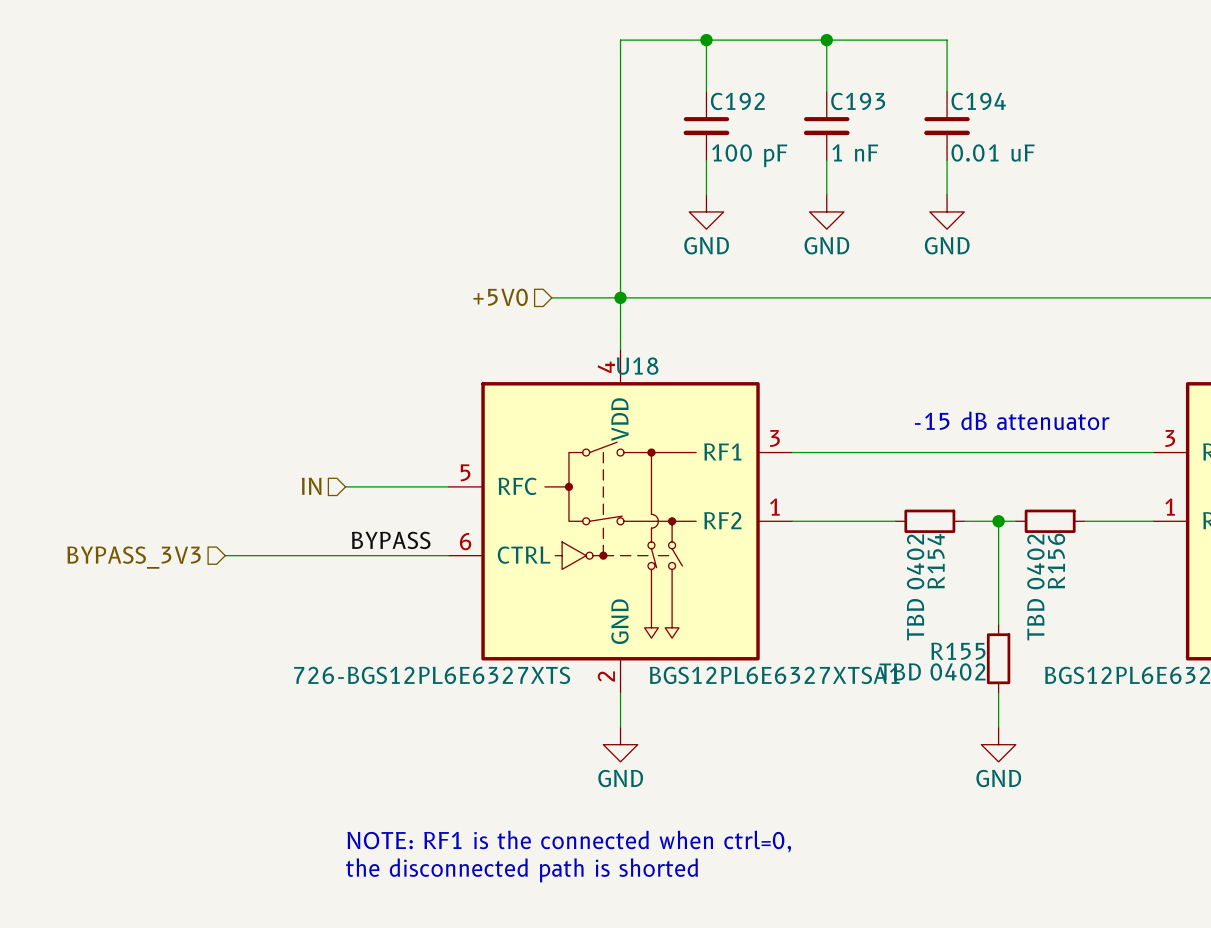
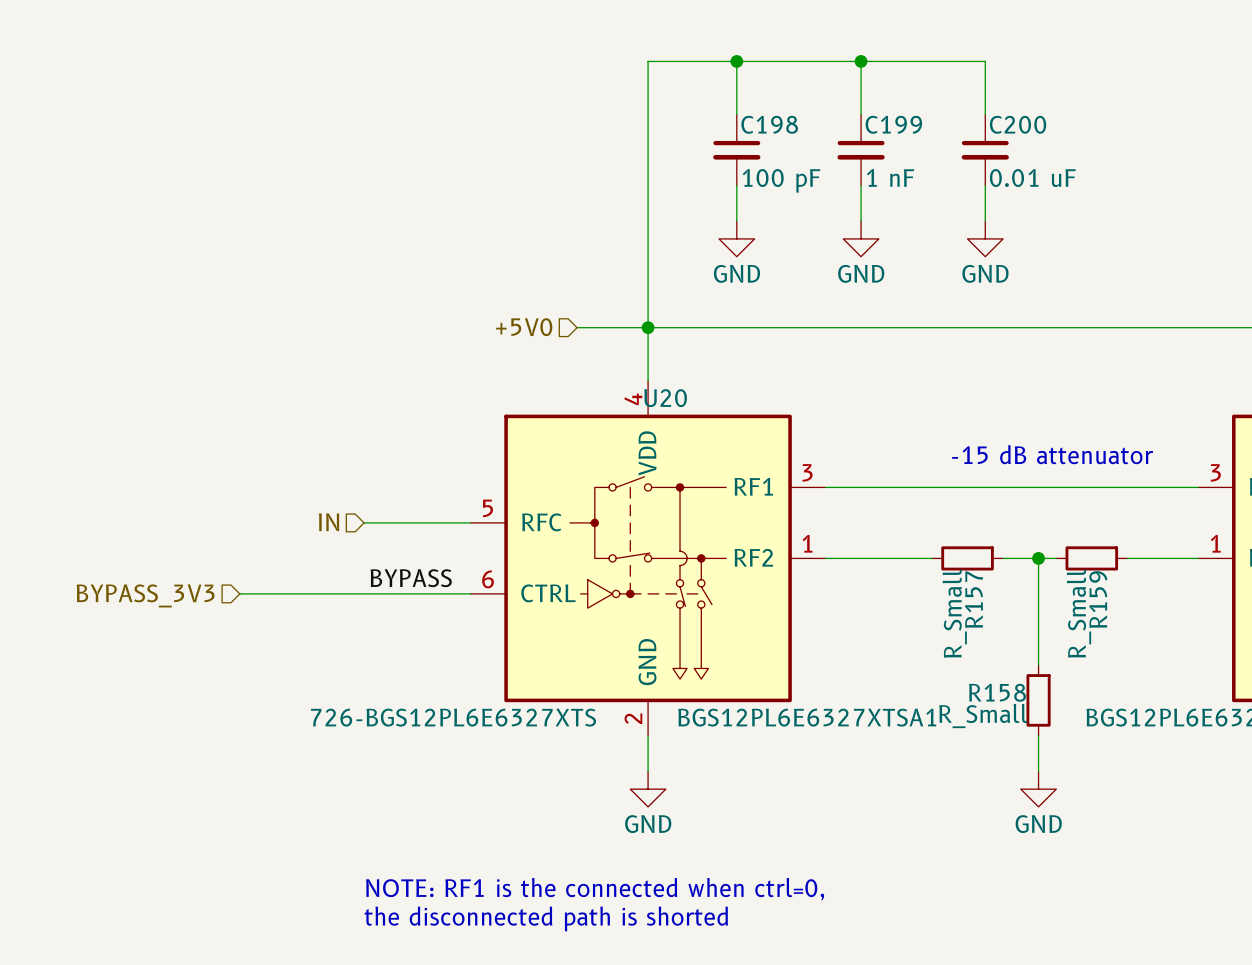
C192 name: C192 (737, 101) -> C198 (769, 124)
C193 name: C193 (858, 101) -> C199 (893, 124)
C194 name: C194 (978, 101) -> C200 (1018, 124)
U18 name: U18 (637, 366) -> U20 (665, 398)
R154 name: R154 (936, 561) -> R157 (973, 599)
R156 name: R156 (1056, 561) -> R159 (1098, 599)
R154 value: TBD 0402 (915, 587) -> R_Small (954, 613)
R156 value: TBD 0402 (1035, 587) -> R_Small (1079, 613)
R155 name: R155 (958, 651) -> R158 (997, 692)
R155 value: TBD 0402 (932, 671) -> R_Small (983, 716)

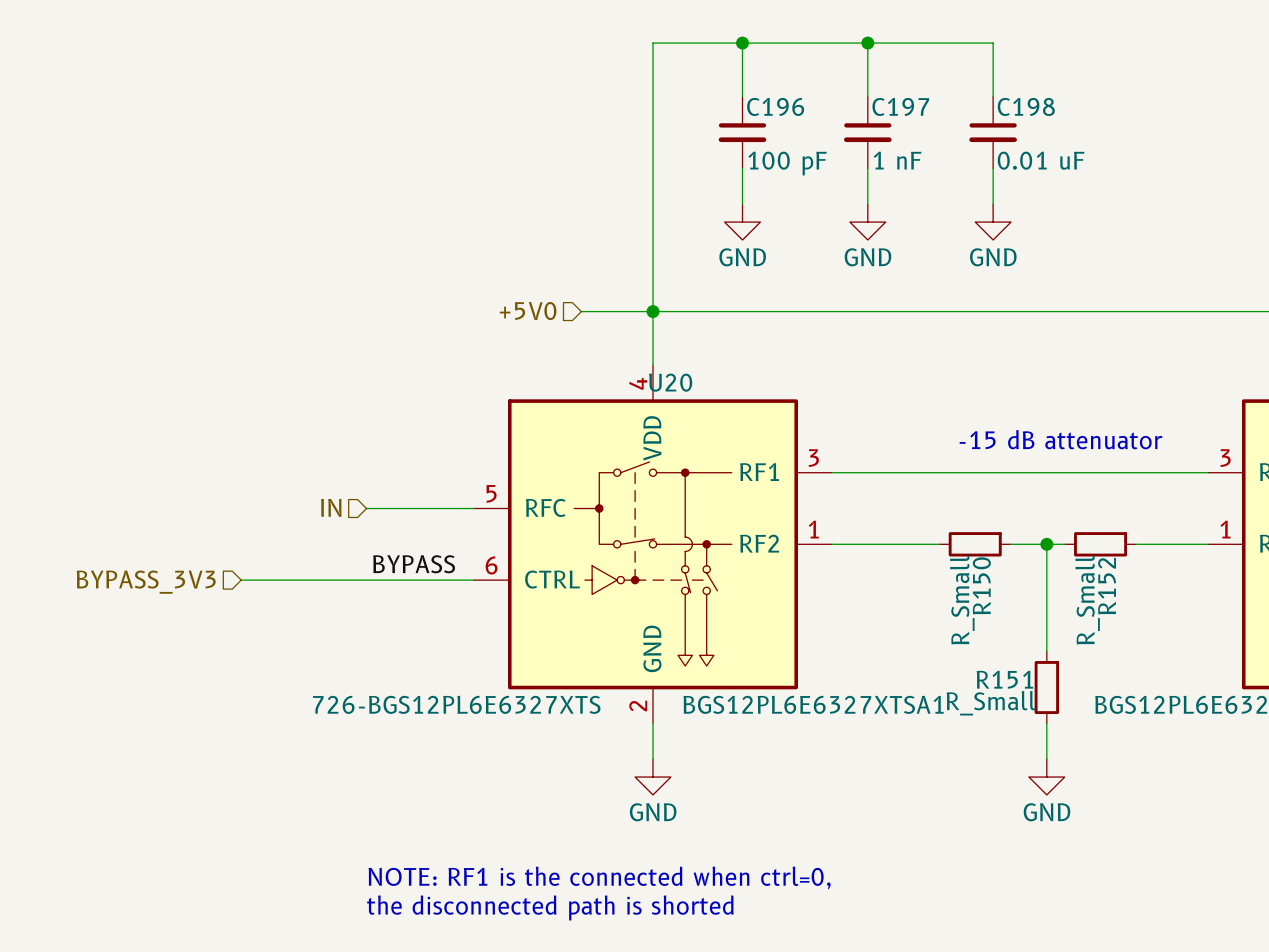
C198 name: C198 (769, 124) -> C196 (775, 106)
C199 name: C199 (893, 124) -> C197 (900, 106)
C200 name: C200 (1018, 124) -> C198 (1026, 106)
R157 name: R157 (973, 599) -> R150 (981, 585)
R159 name: R159 (1098, 599) -> R152 (1107, 586)
R158 name: R158 (997, 692) -> R151 (1004, 679)

